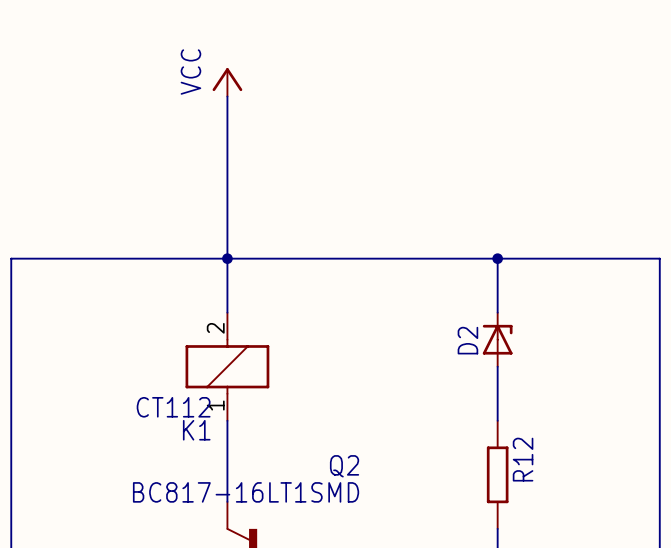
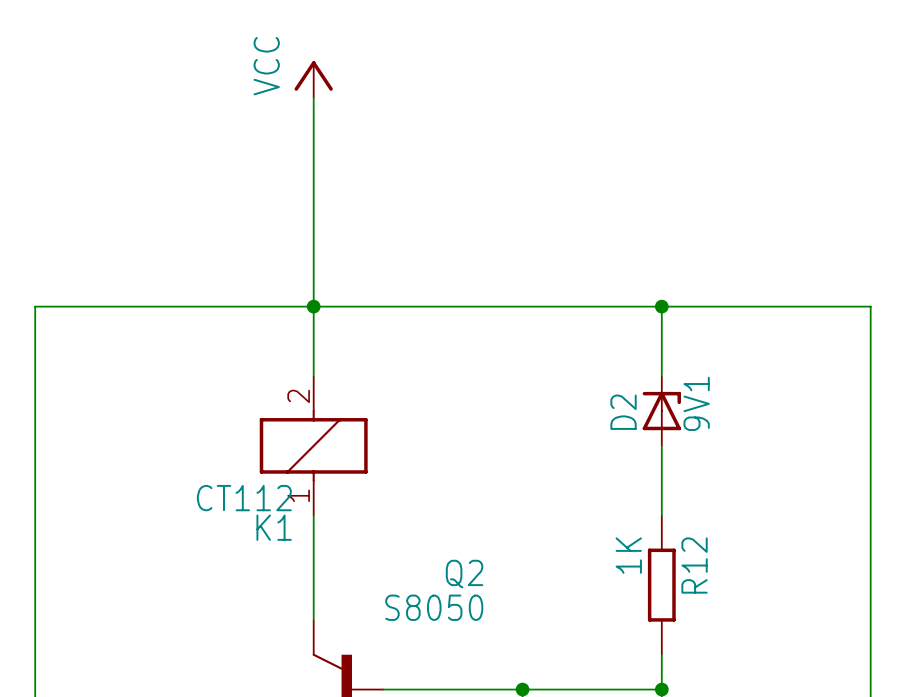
D2 value: none -> 9V1 (696, 403)
R12 value: none -> 1K (628, 555)
Q2 value: BC817-16LT1SMD (246, 492) -> S8050 (434, 607)

